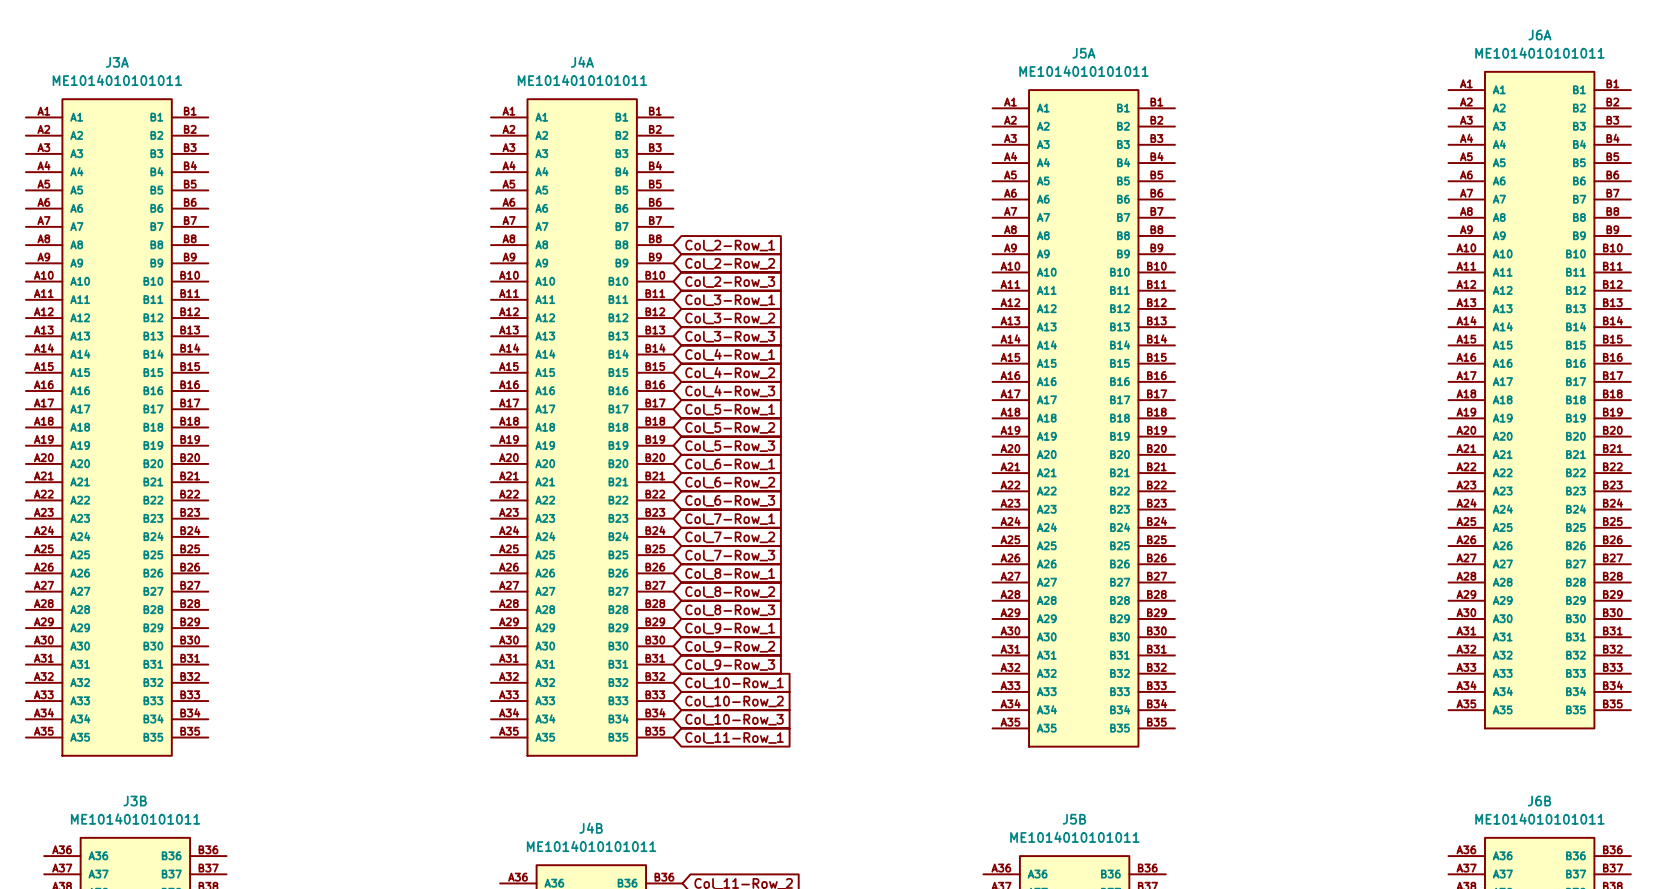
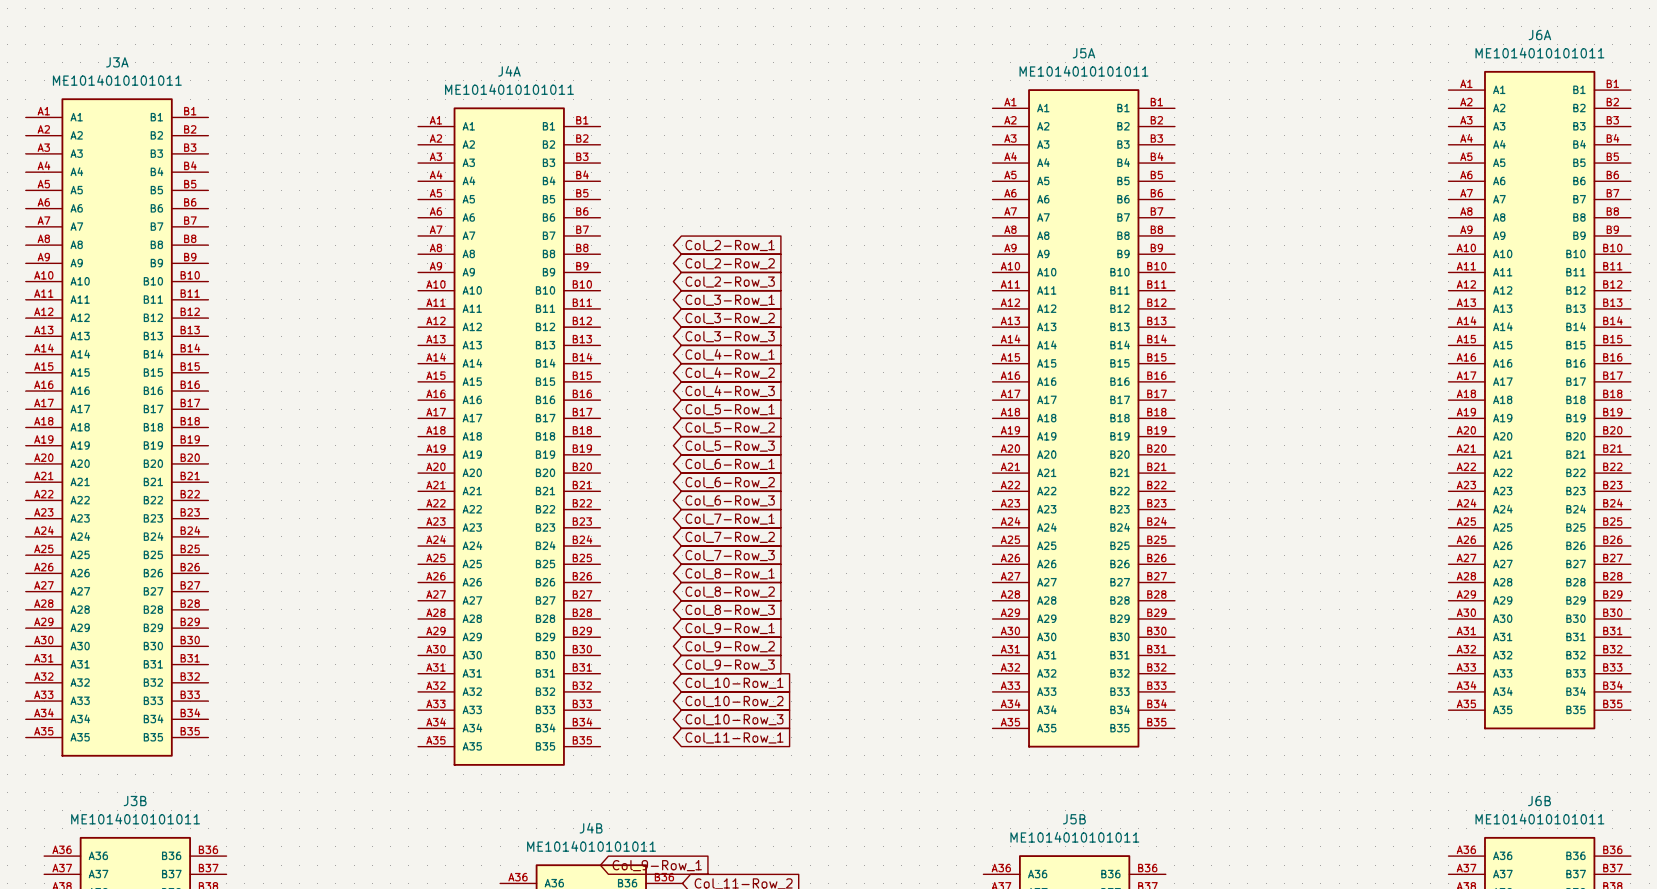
J4A position: (582, 427) -> (509, 436)
global label: none -> Col_9-Row_1 (657, 865)

